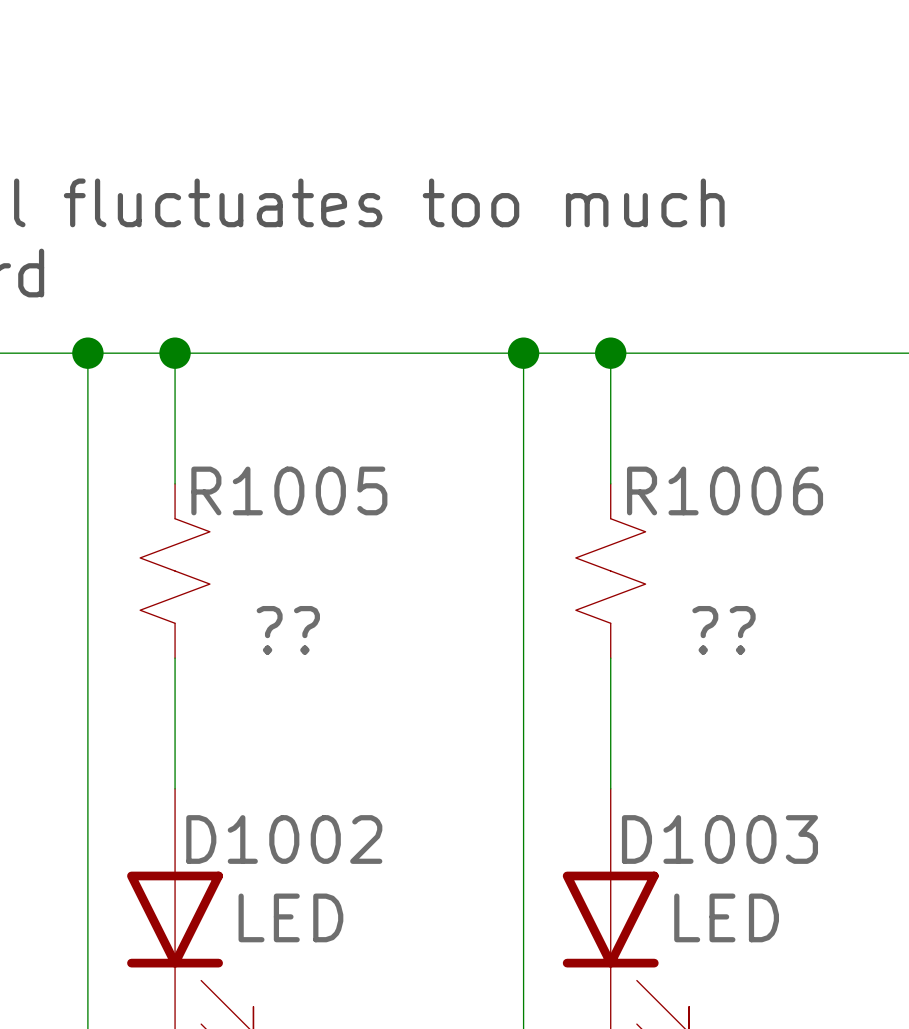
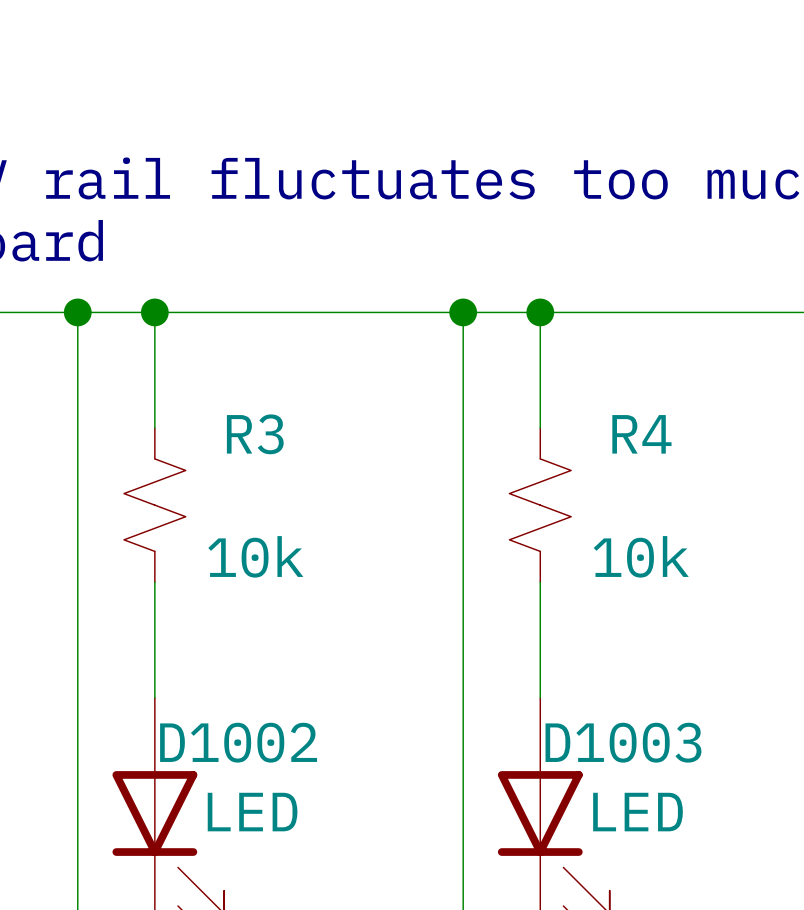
R1005 name: R1005 (289, 490) -> R3 (255, 434)
R1006 name: R1006 (725, 490) -> R4 (641, 434)
R1005 value: ?? (288, 630) -> 10k (255, 556)
R1006 value: ?? (723, 630) -> 10k (641, 556)

